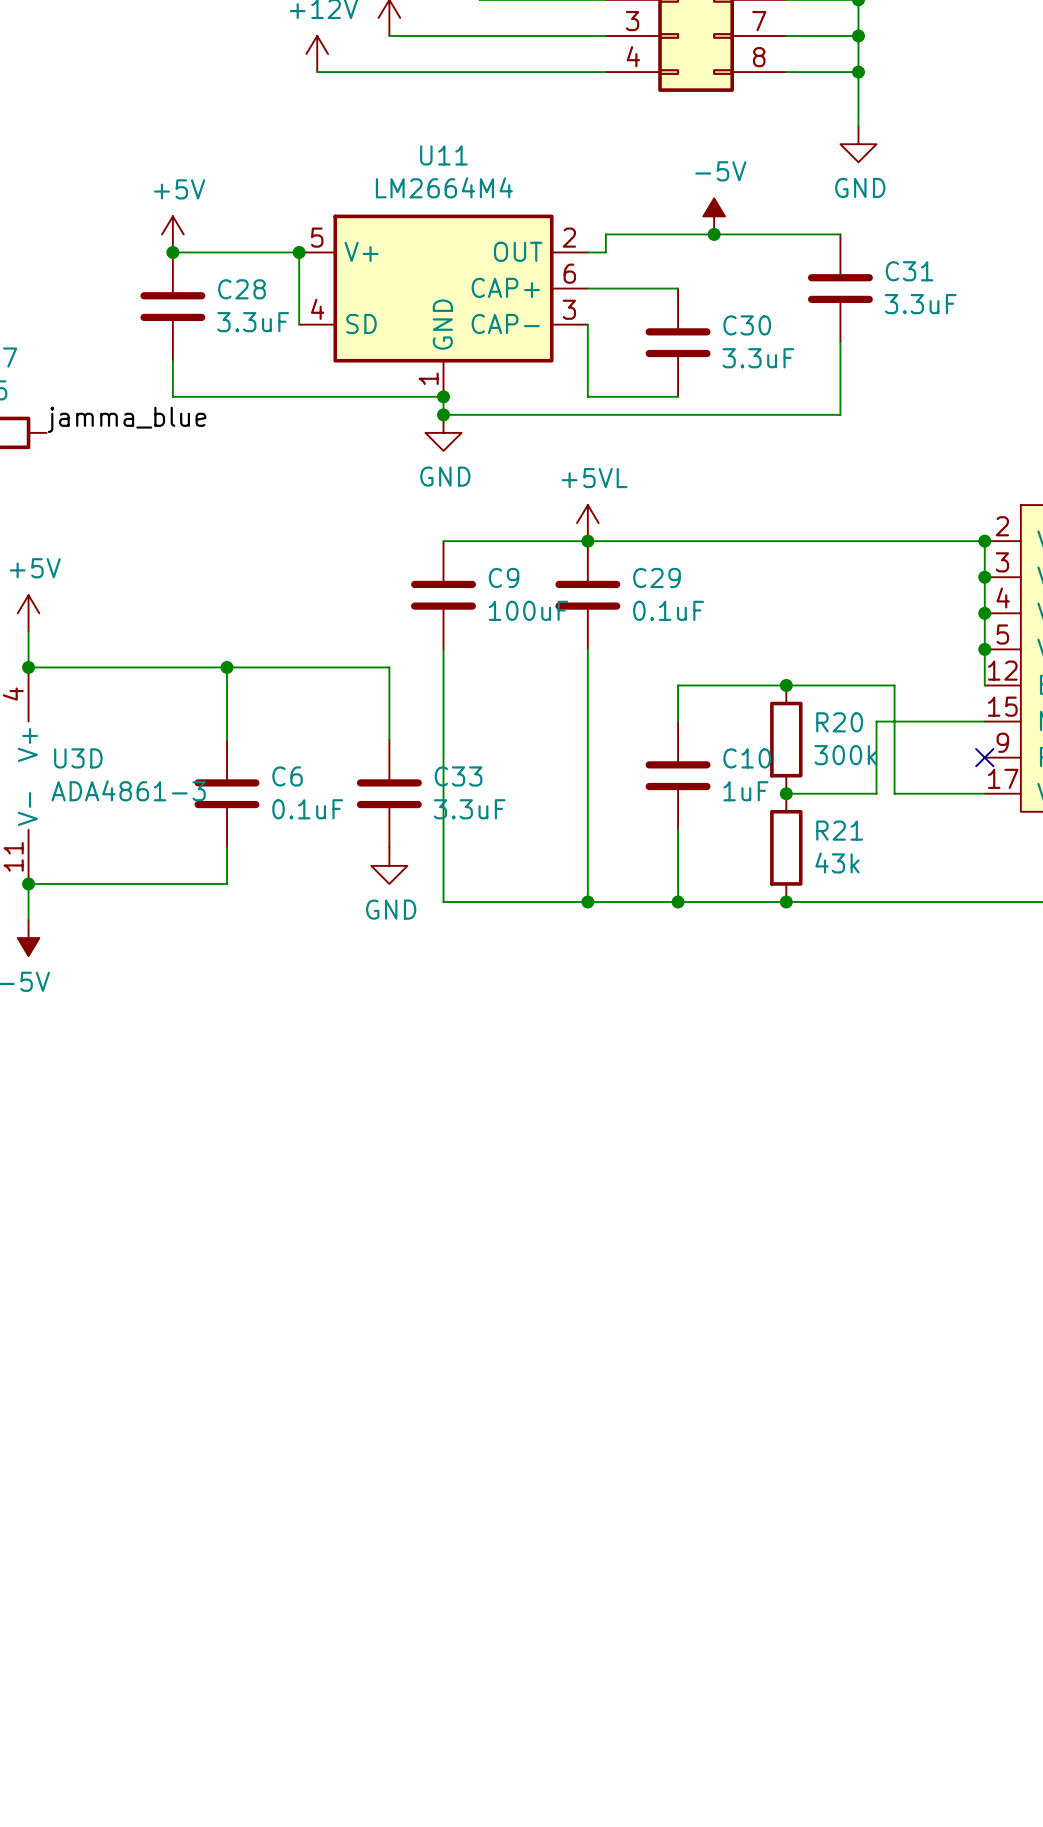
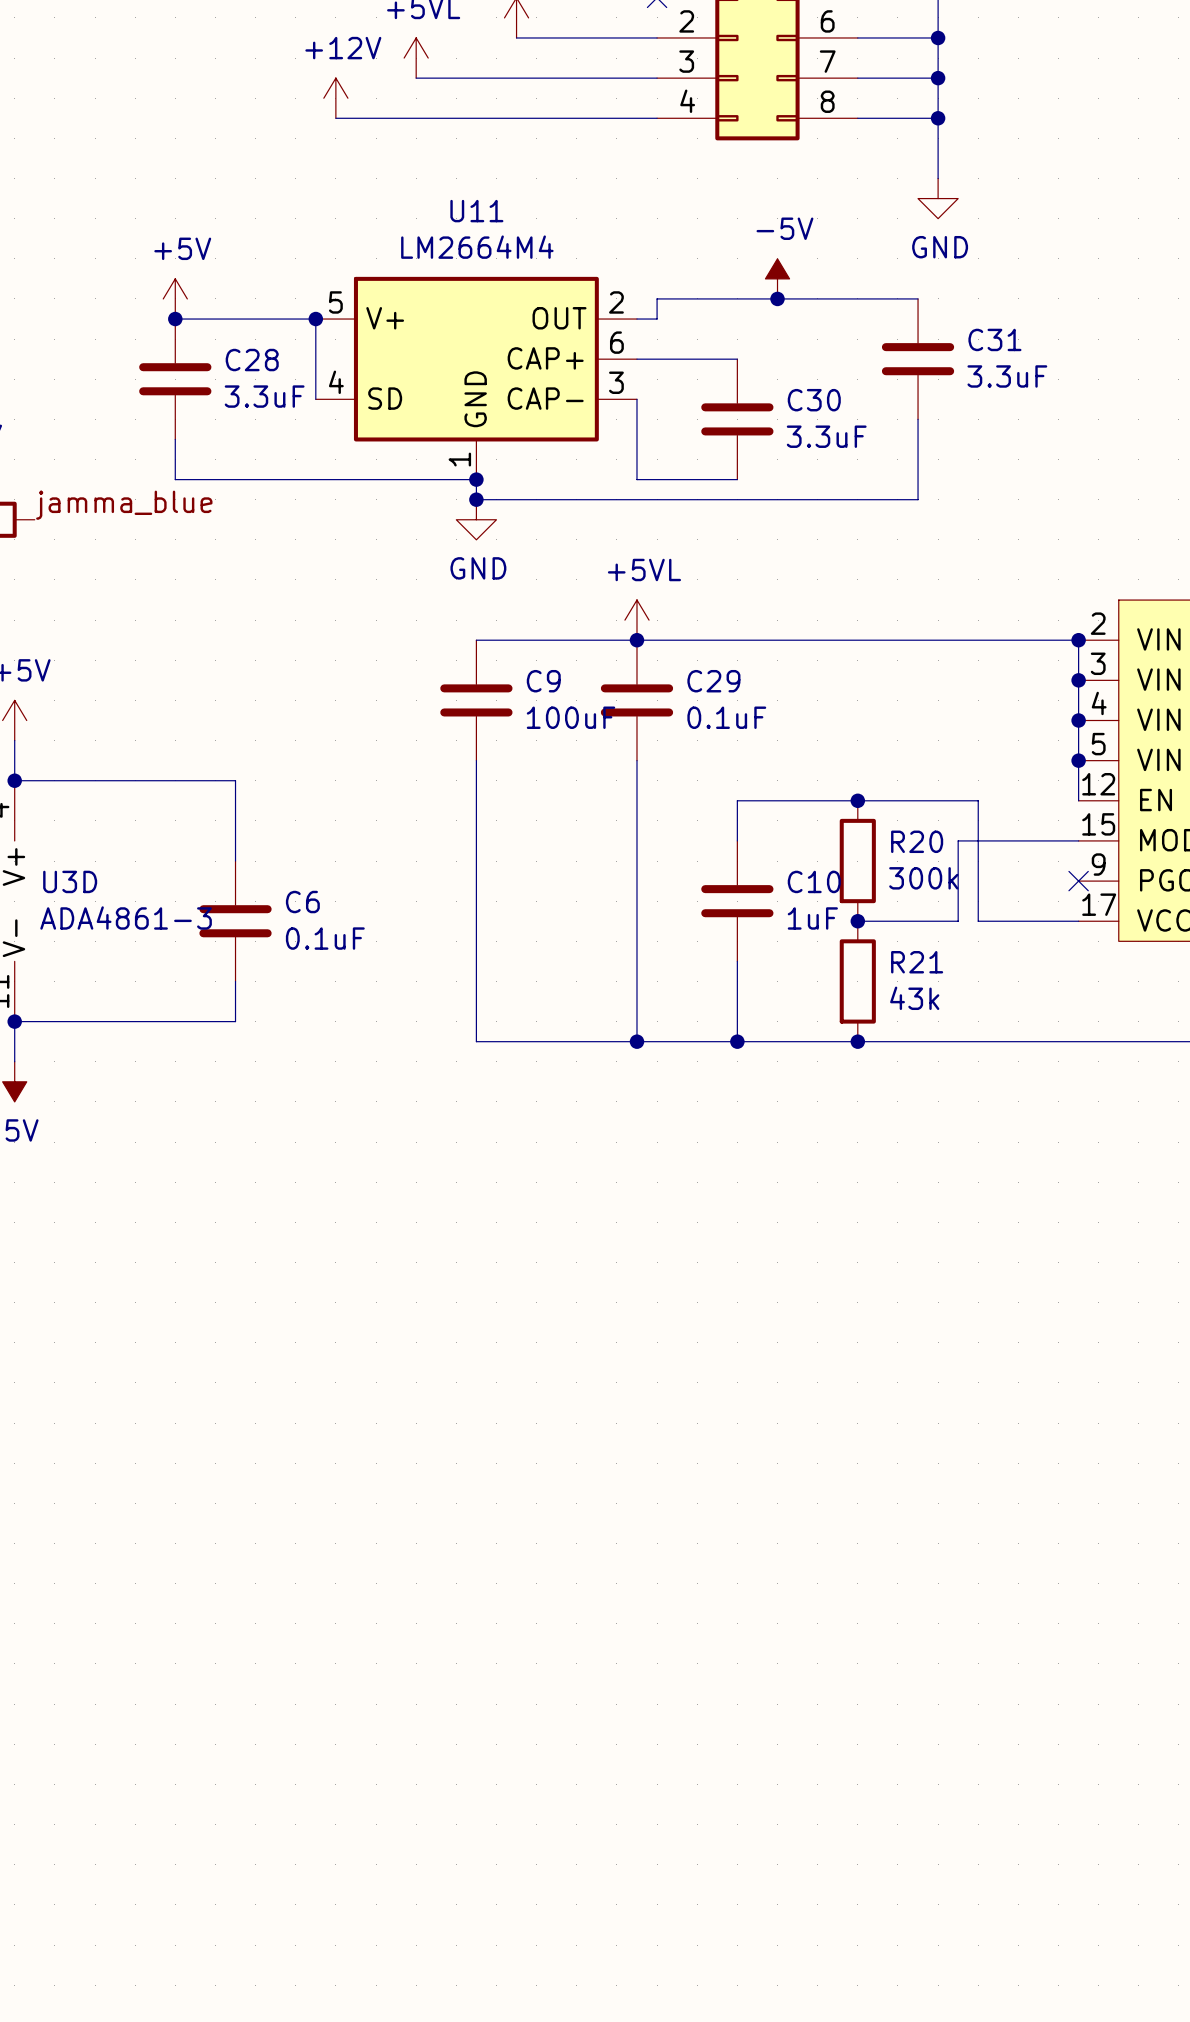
wire: (227, 667) (389, 667) (389, 739) -> none
junction: (227, 667) -> none
C33: 3.3uF (389, 793) -> none
power symbol: GND (389, 865) -> none

